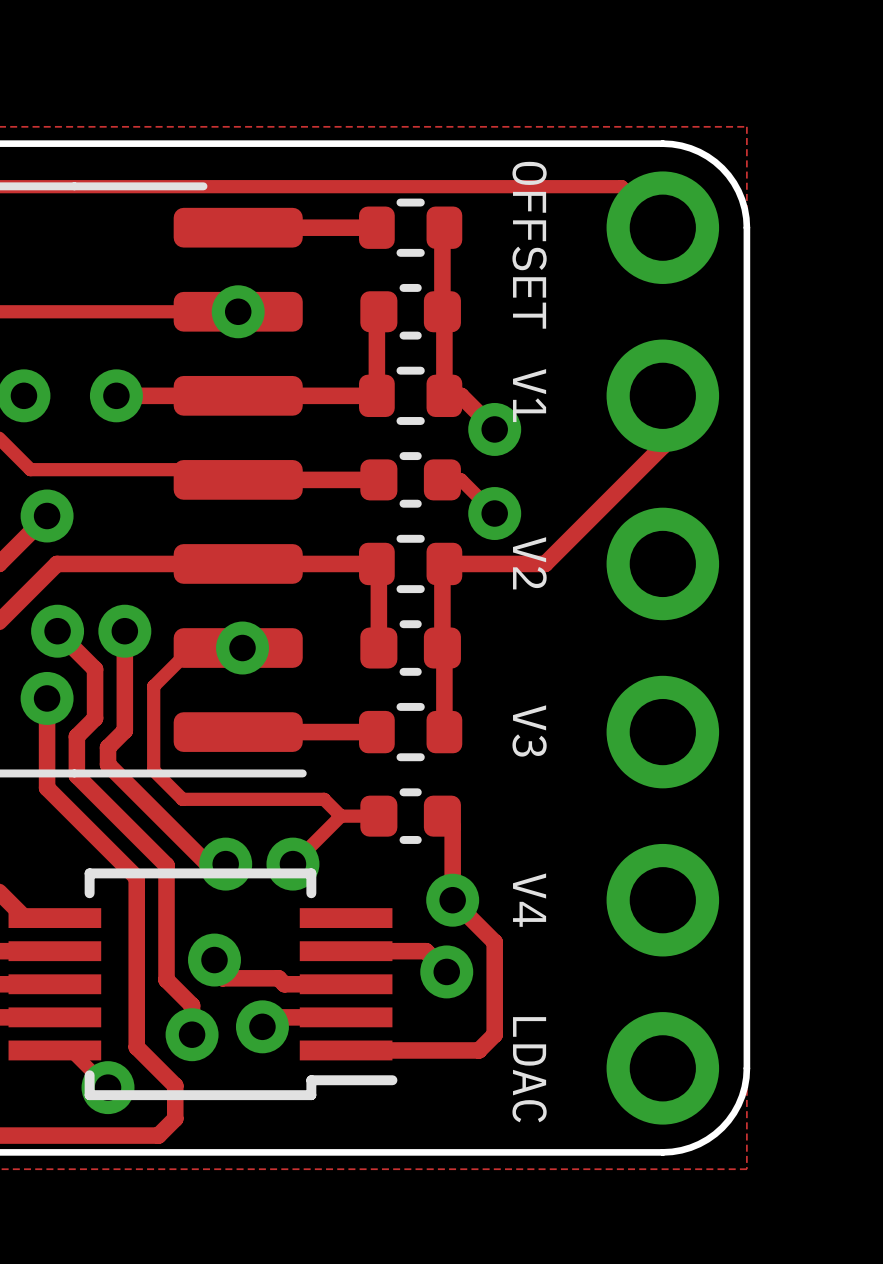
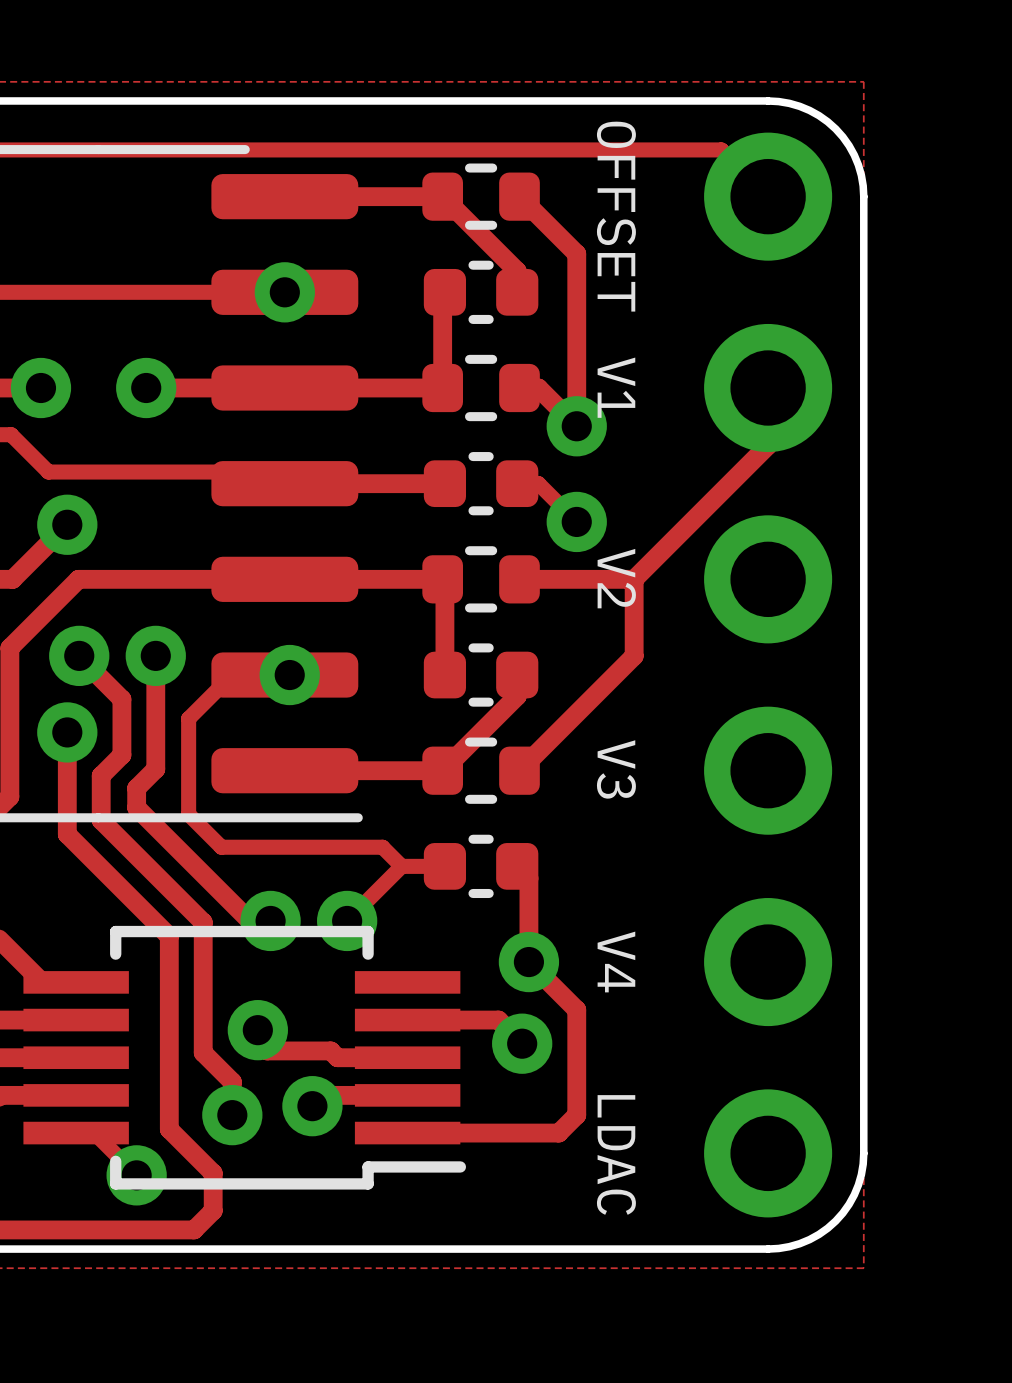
track: (444, 227) (442, 229) (442, 293) -> (442, 196) (517, 271)
track: none -> (519, 196) (576, 253) (576, 426)
track: (442, 311) (444, 313) (444, 395) -> none
track: (444, 563) (442, 565) (444, 732) -> (634, 579) (634, 656) (519, 770)
track: none -> (517, 675) (517, 696) (442, 770)

